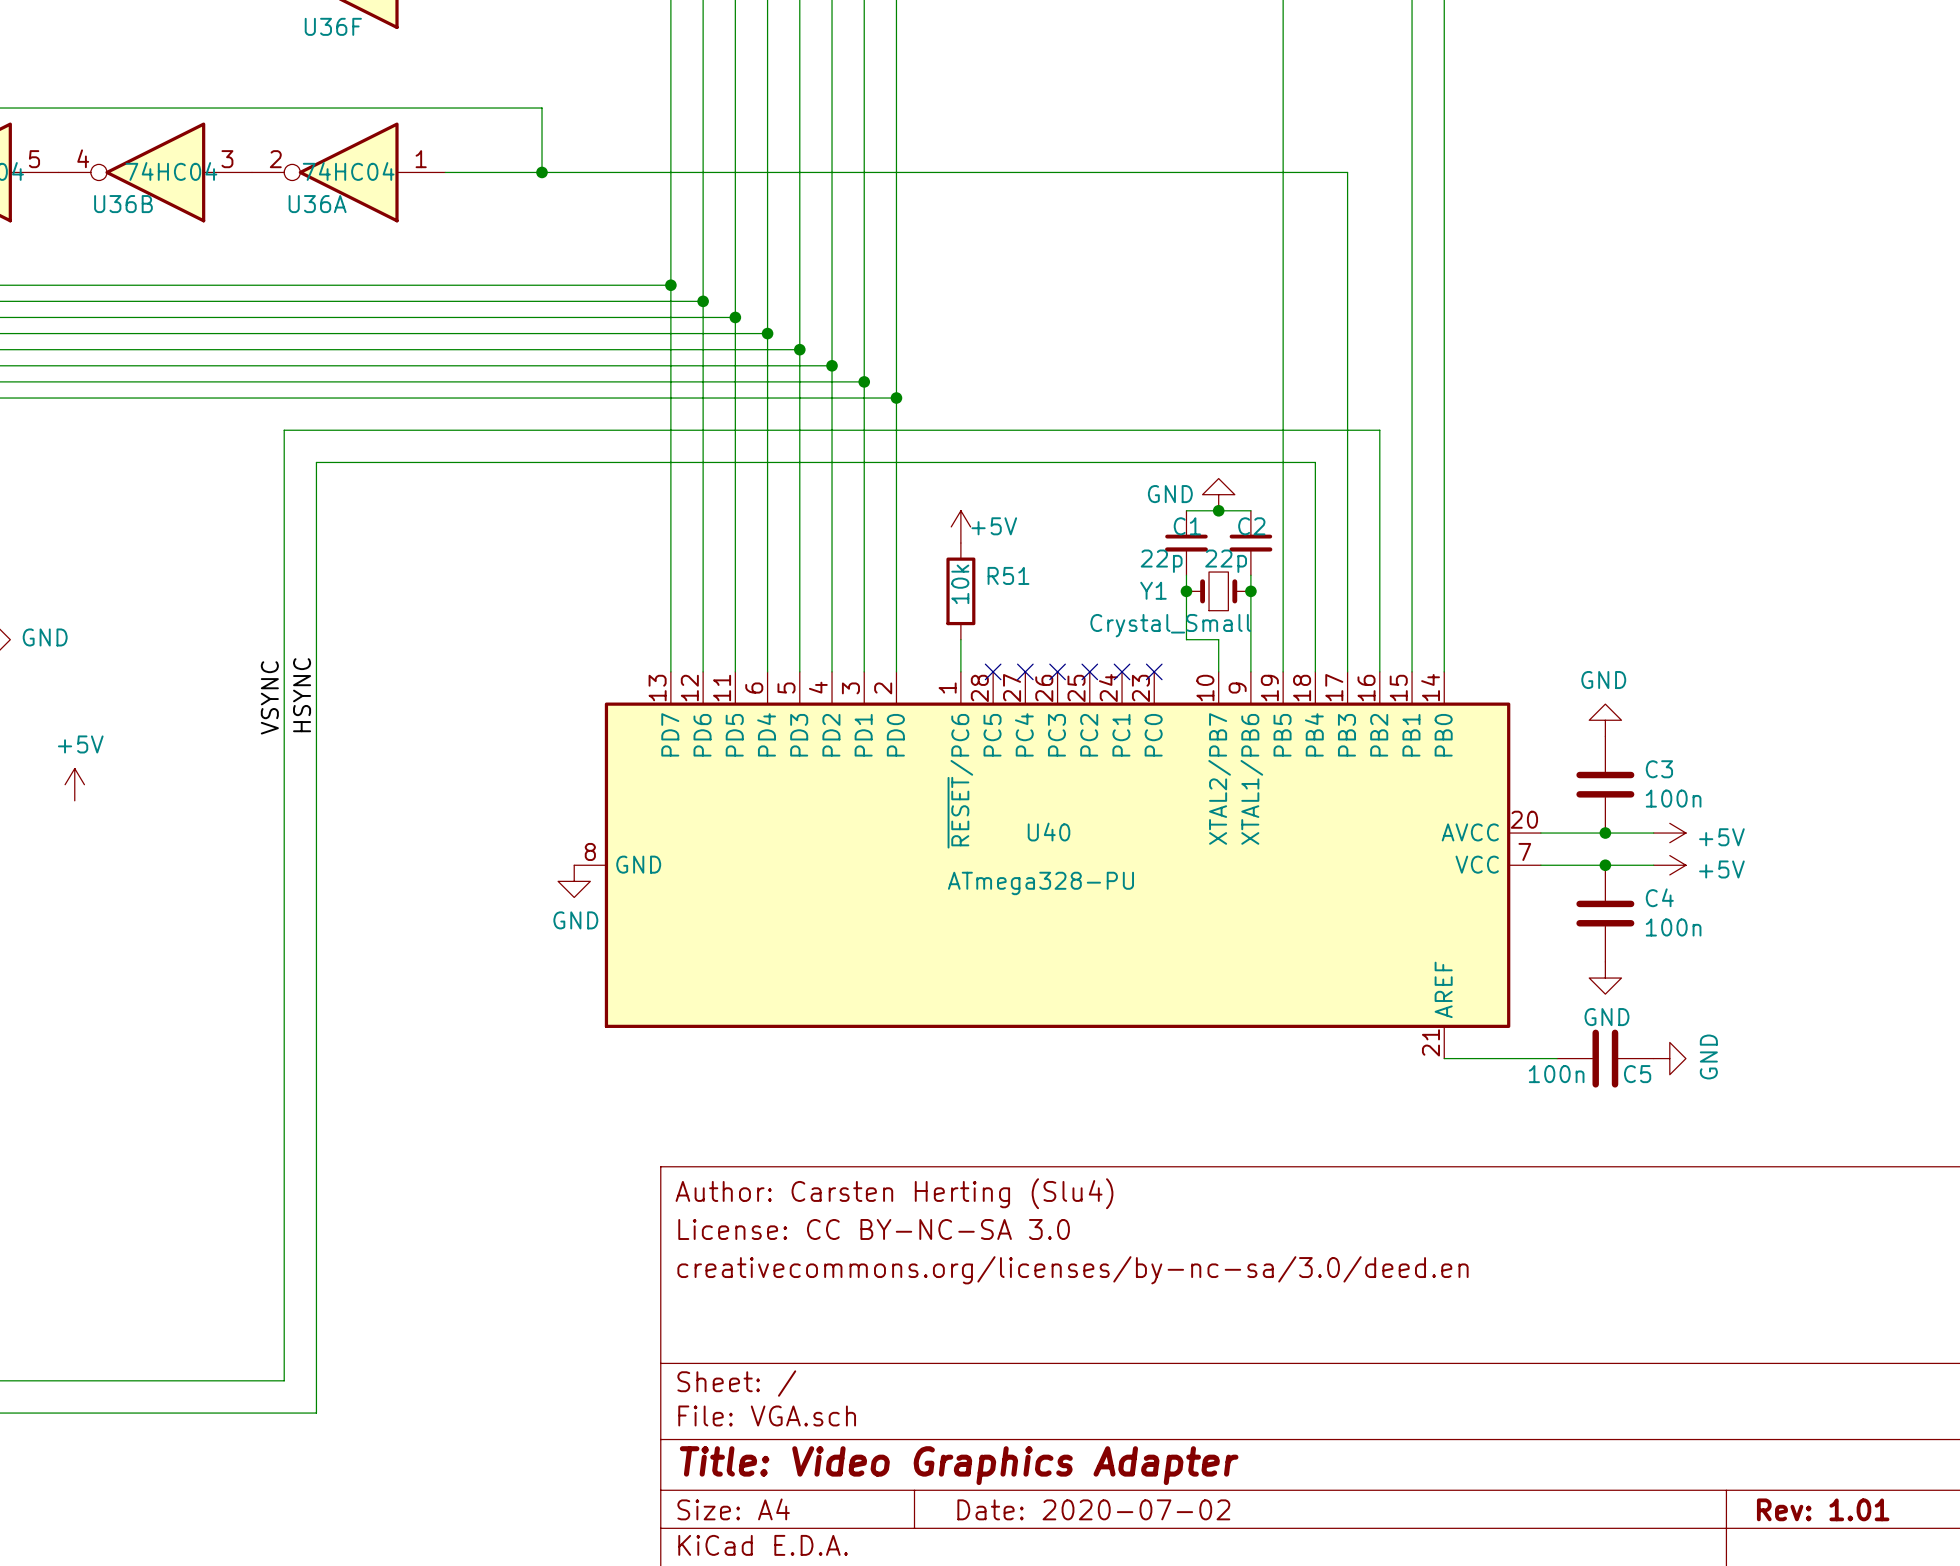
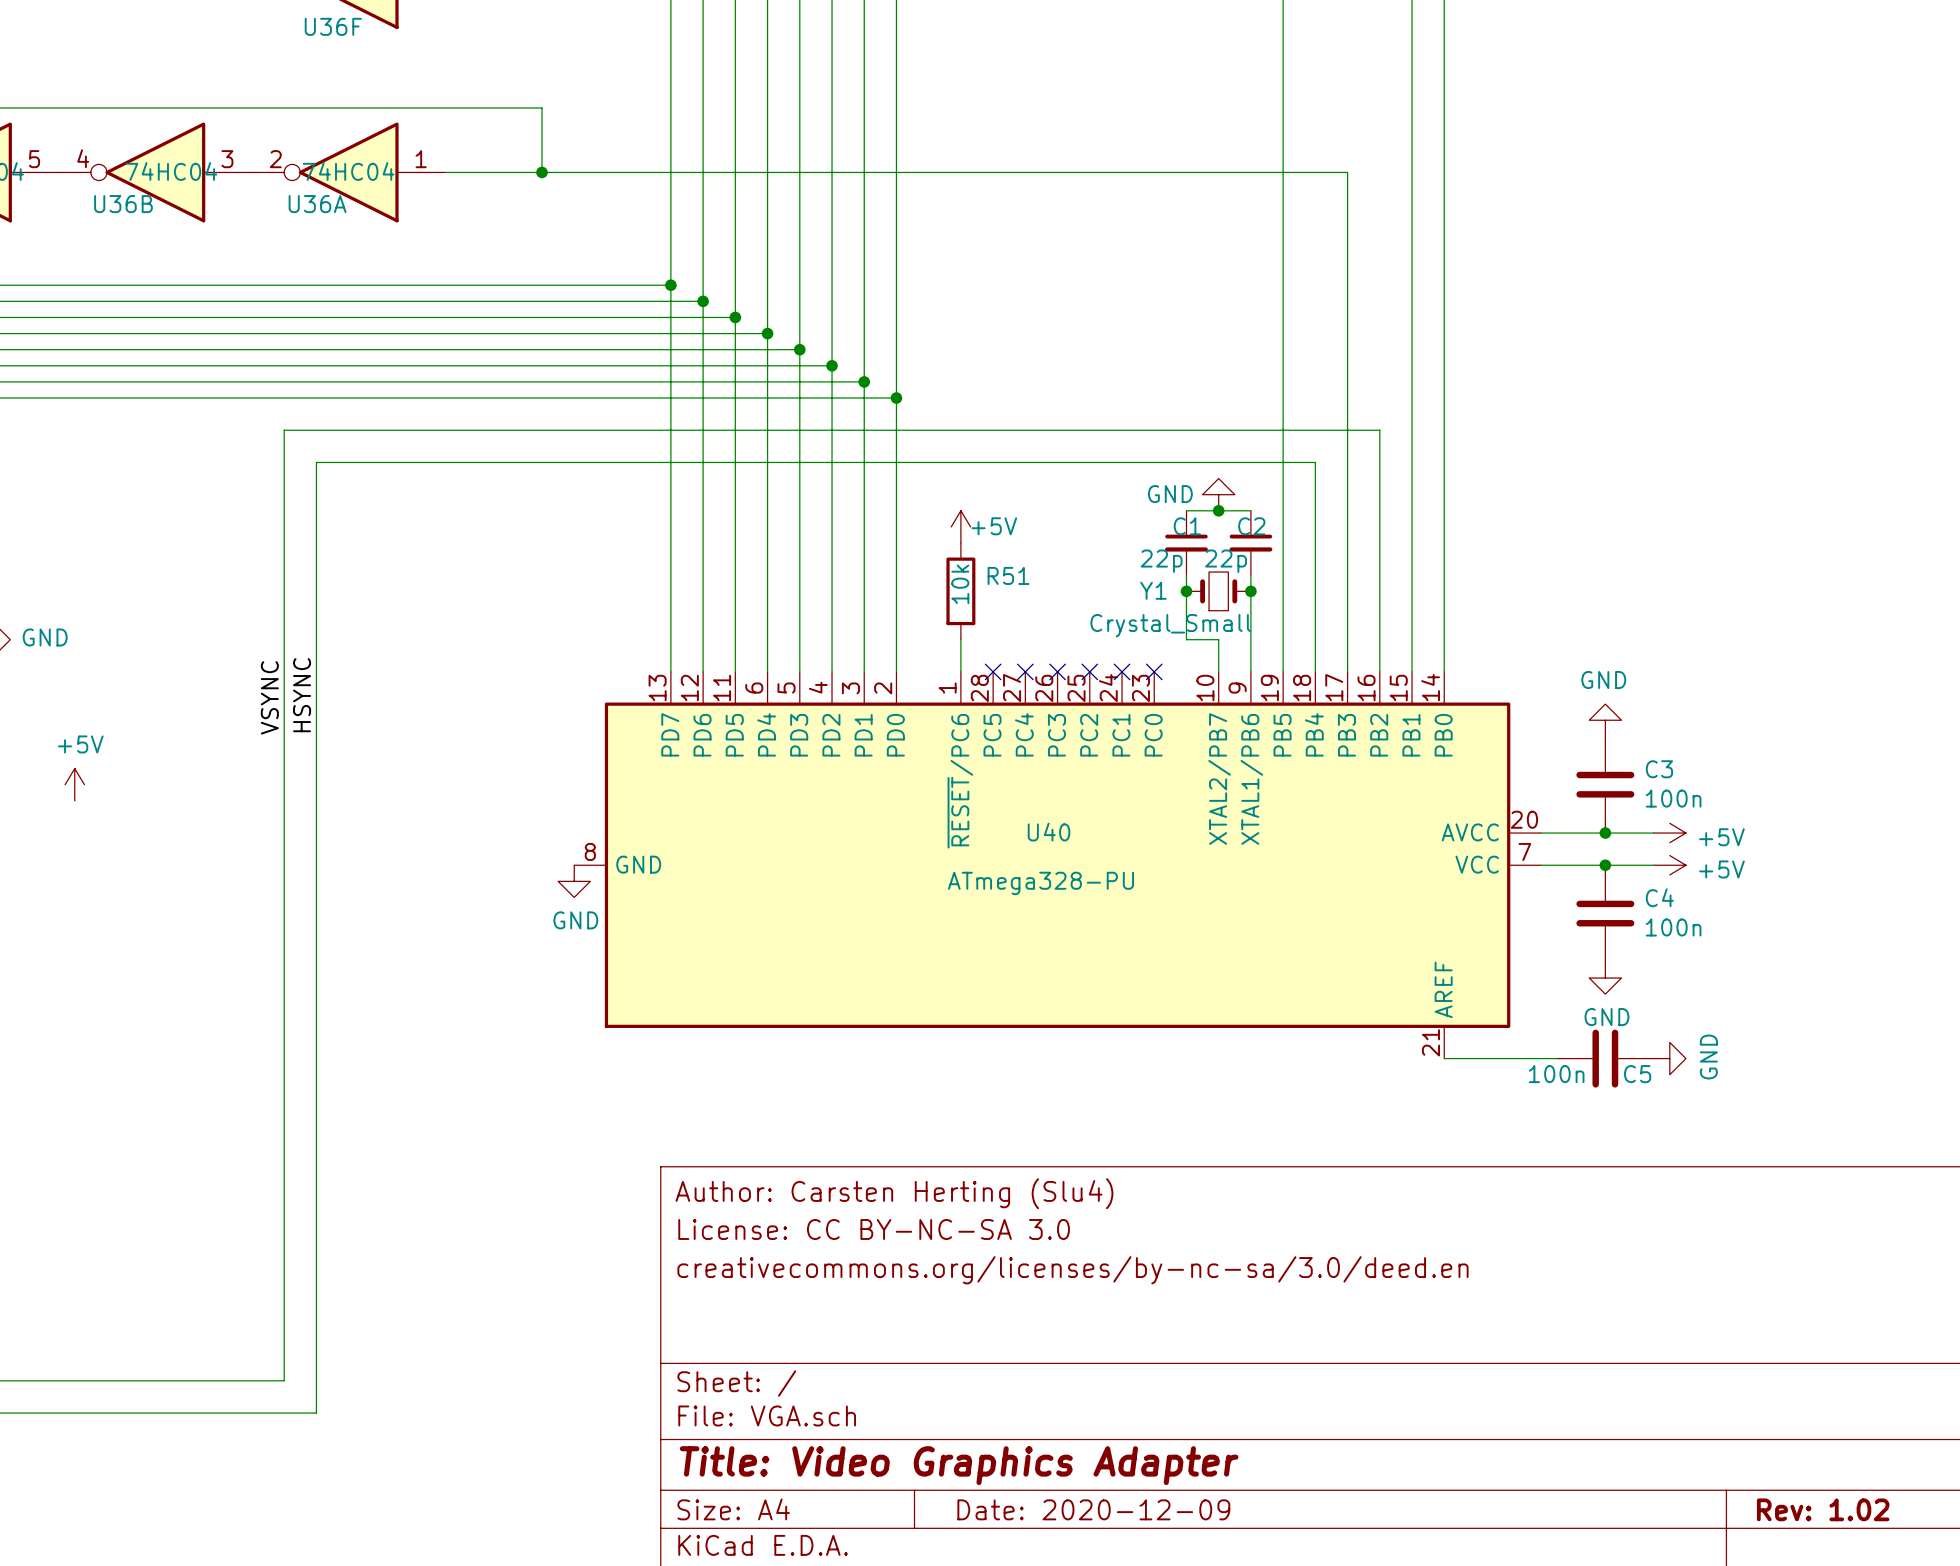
title block: Date: 2020-07-02 (1093, 1509) -> Date: 2020-12-09 (1093, 1509)
title block: Rev: 1.01 (1823, 1509) -> Rev: 1.02 (1823, 1509)

